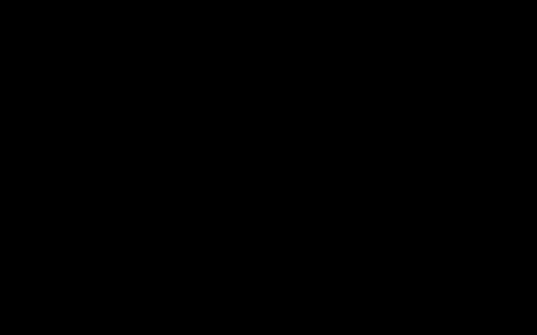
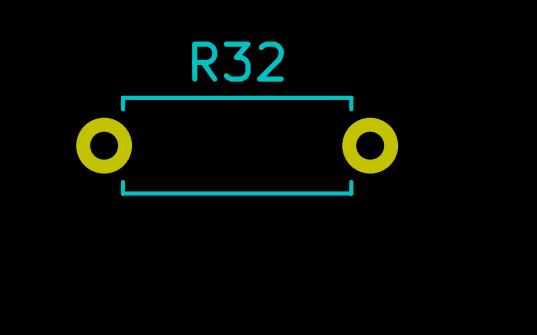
R32: none -> (237, 145)

